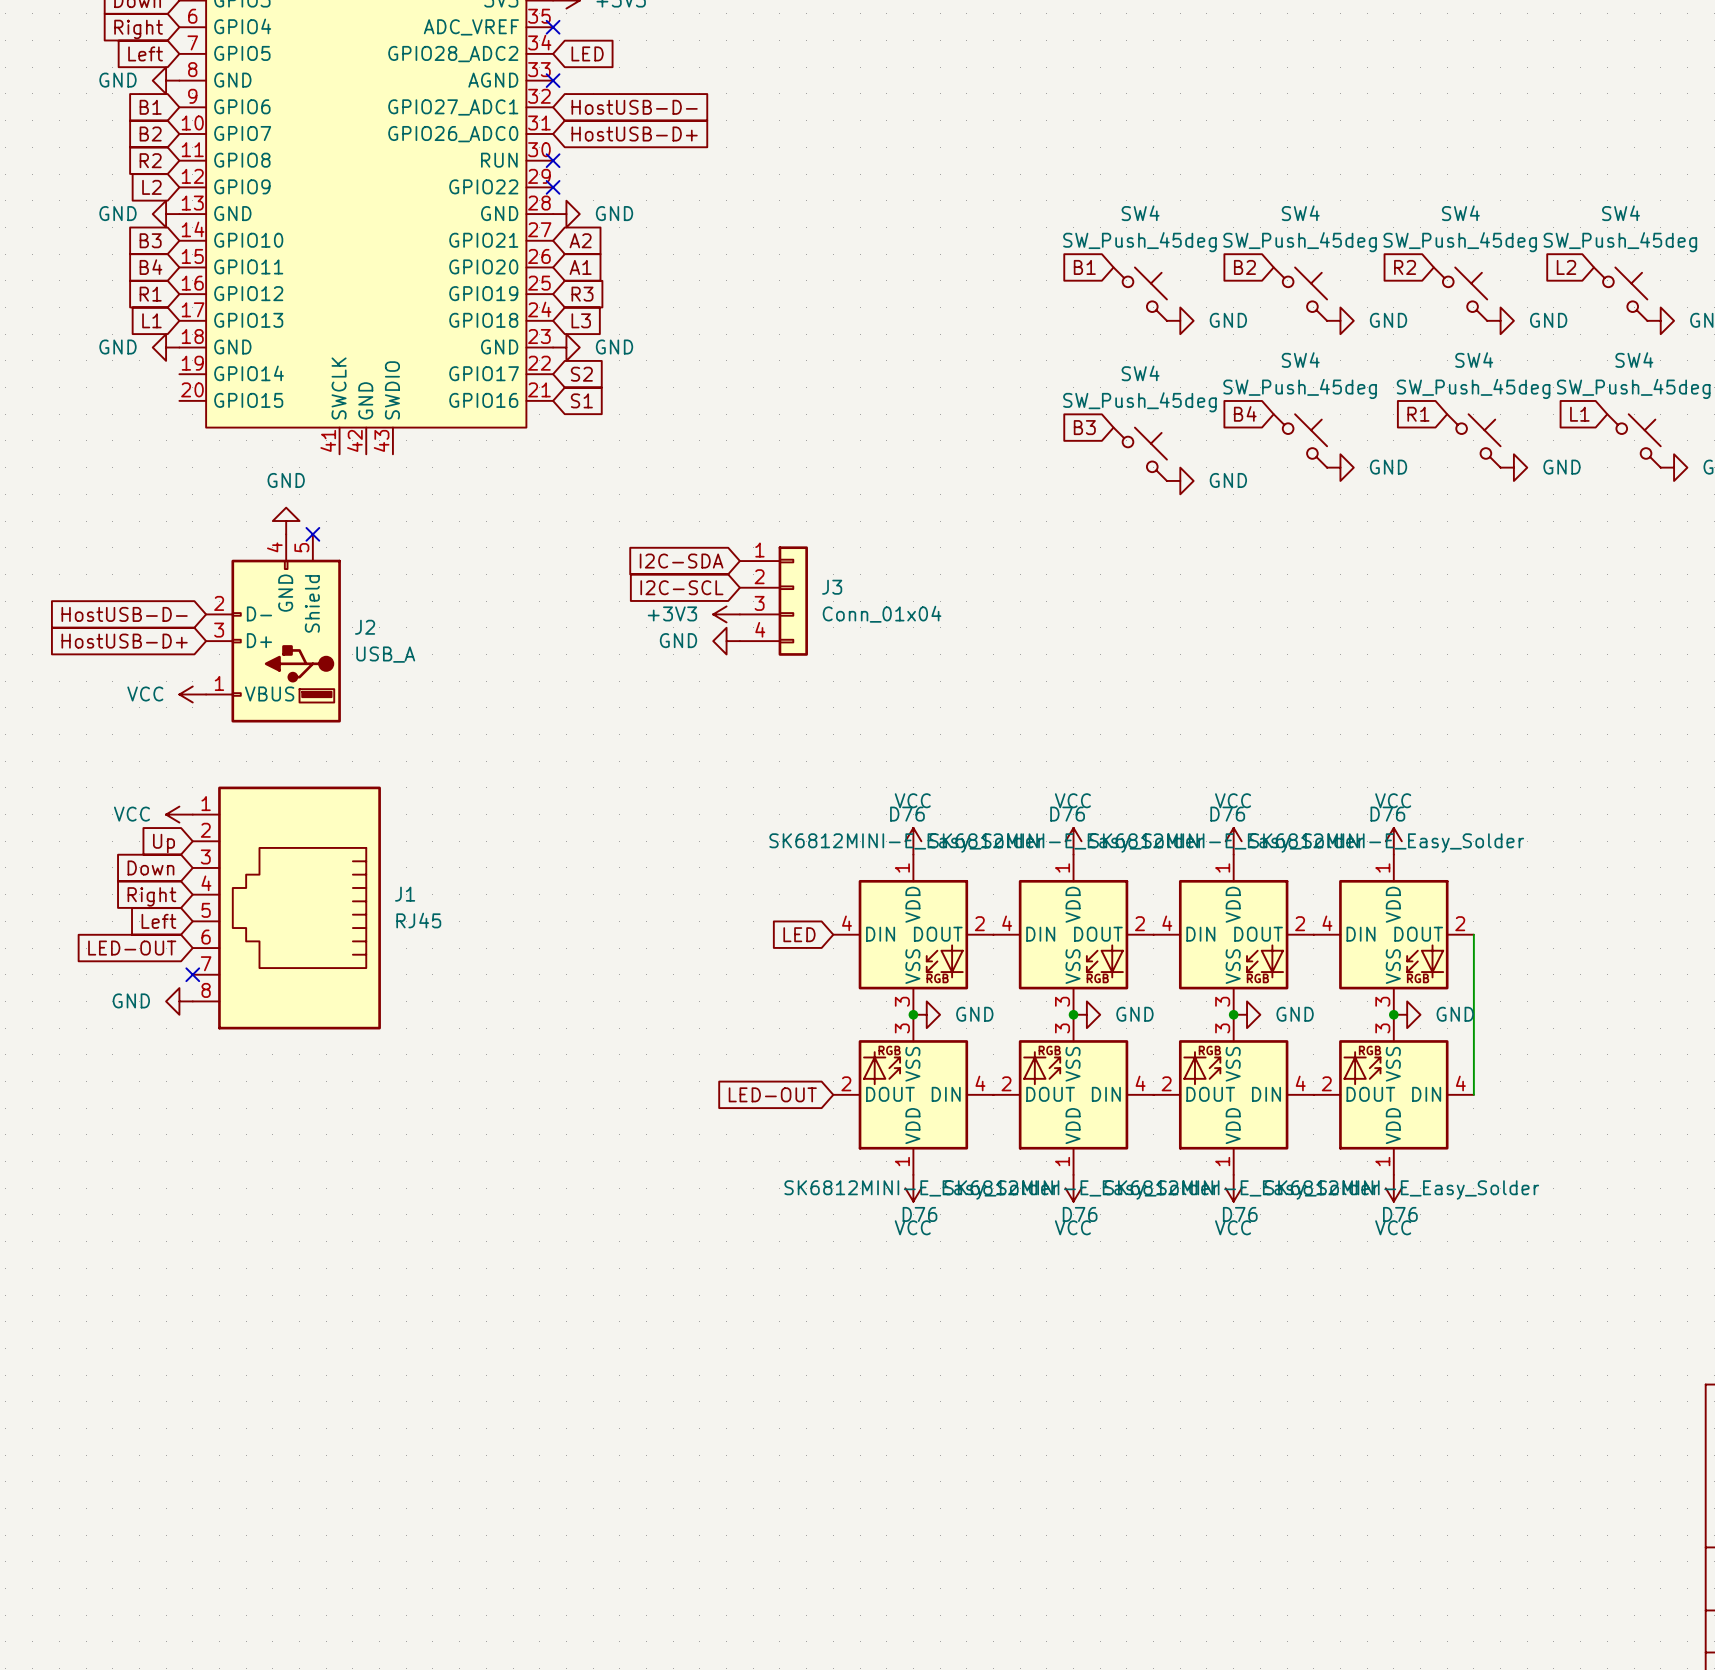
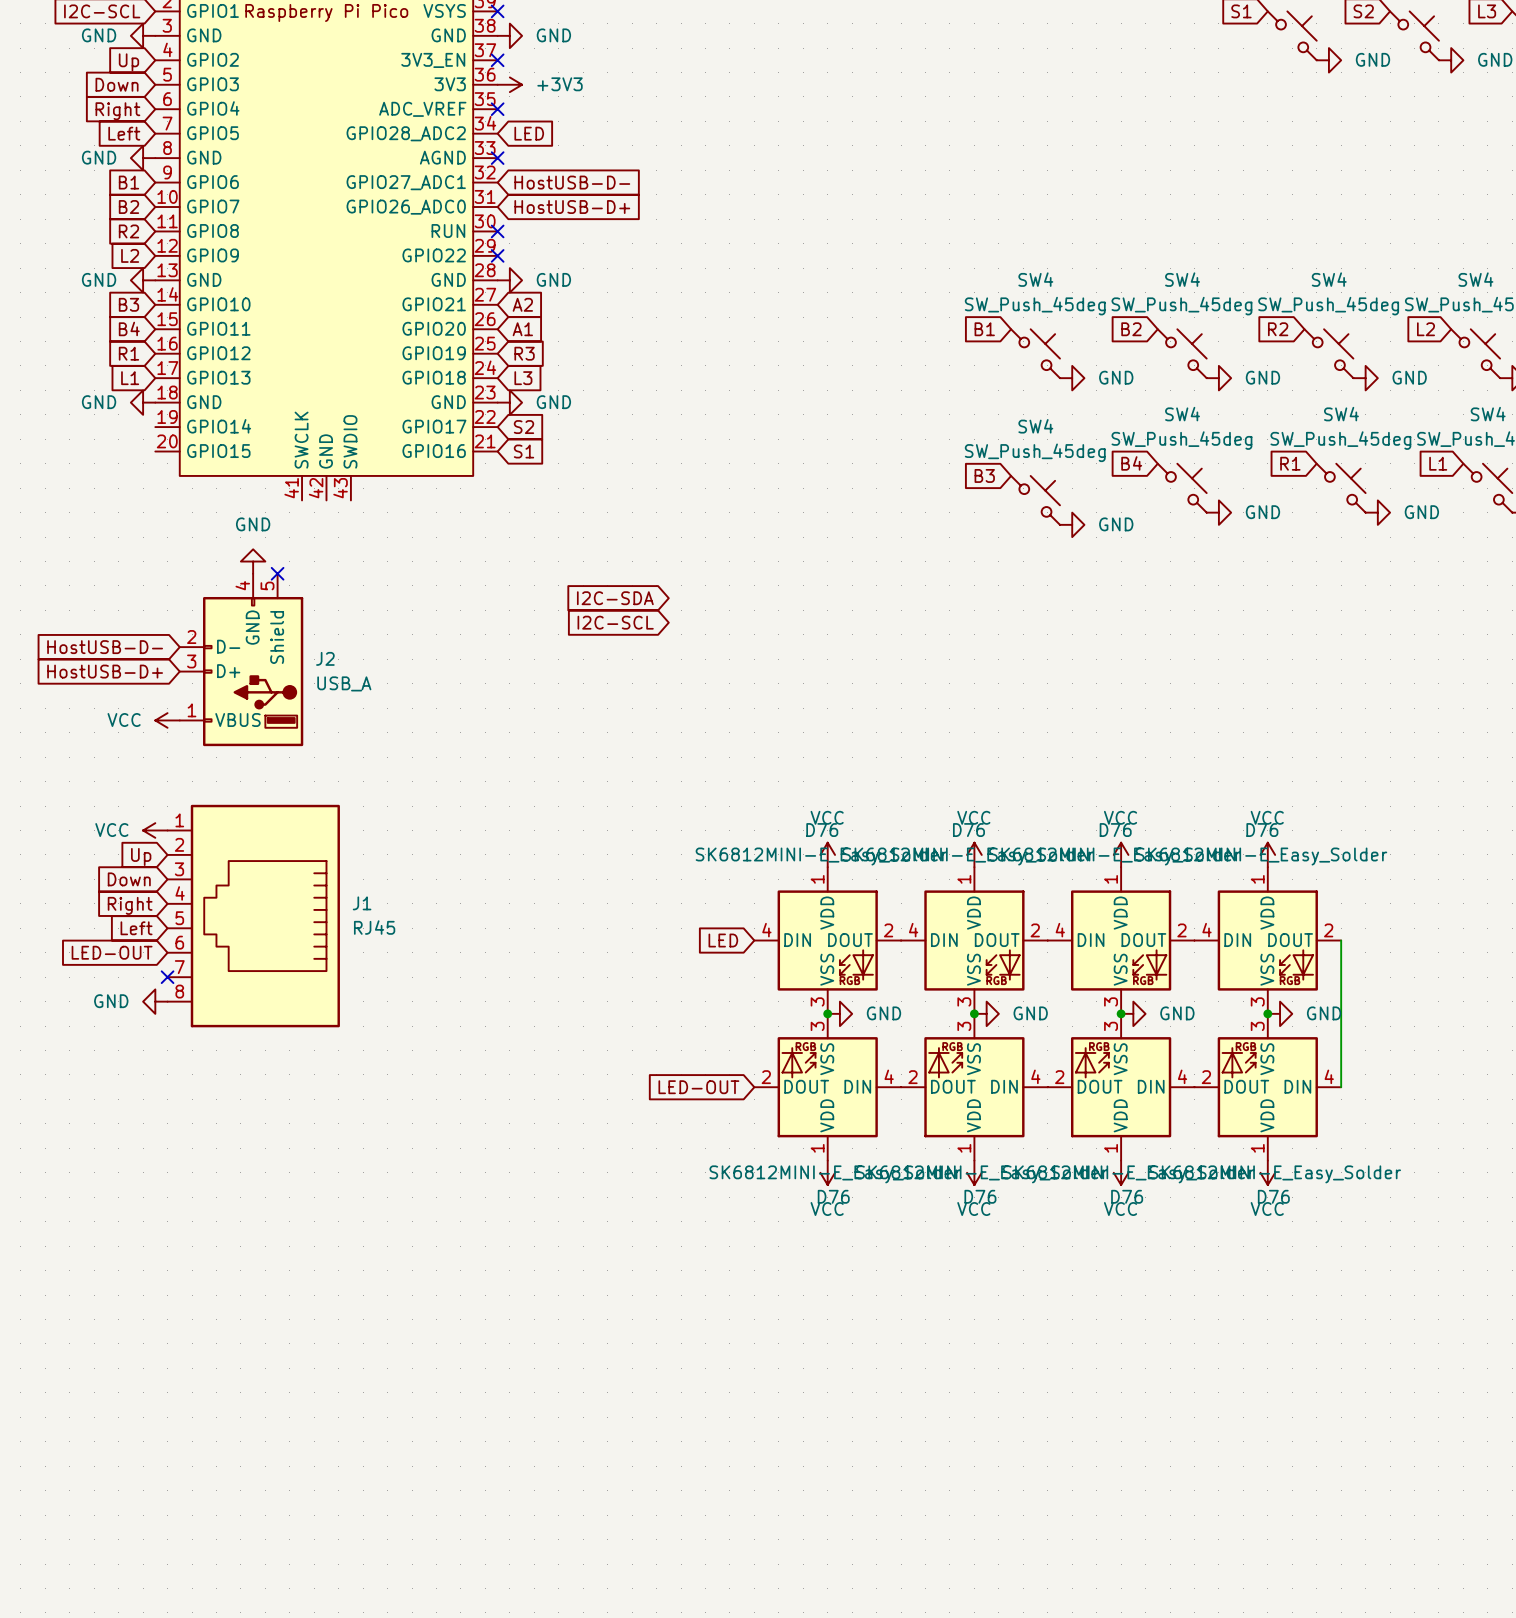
J3: Conn_01x04 (773, 601) -> none
power symbol: +3V3 (726, 614) -> none
power symbol: GND (726, 641) -> none

